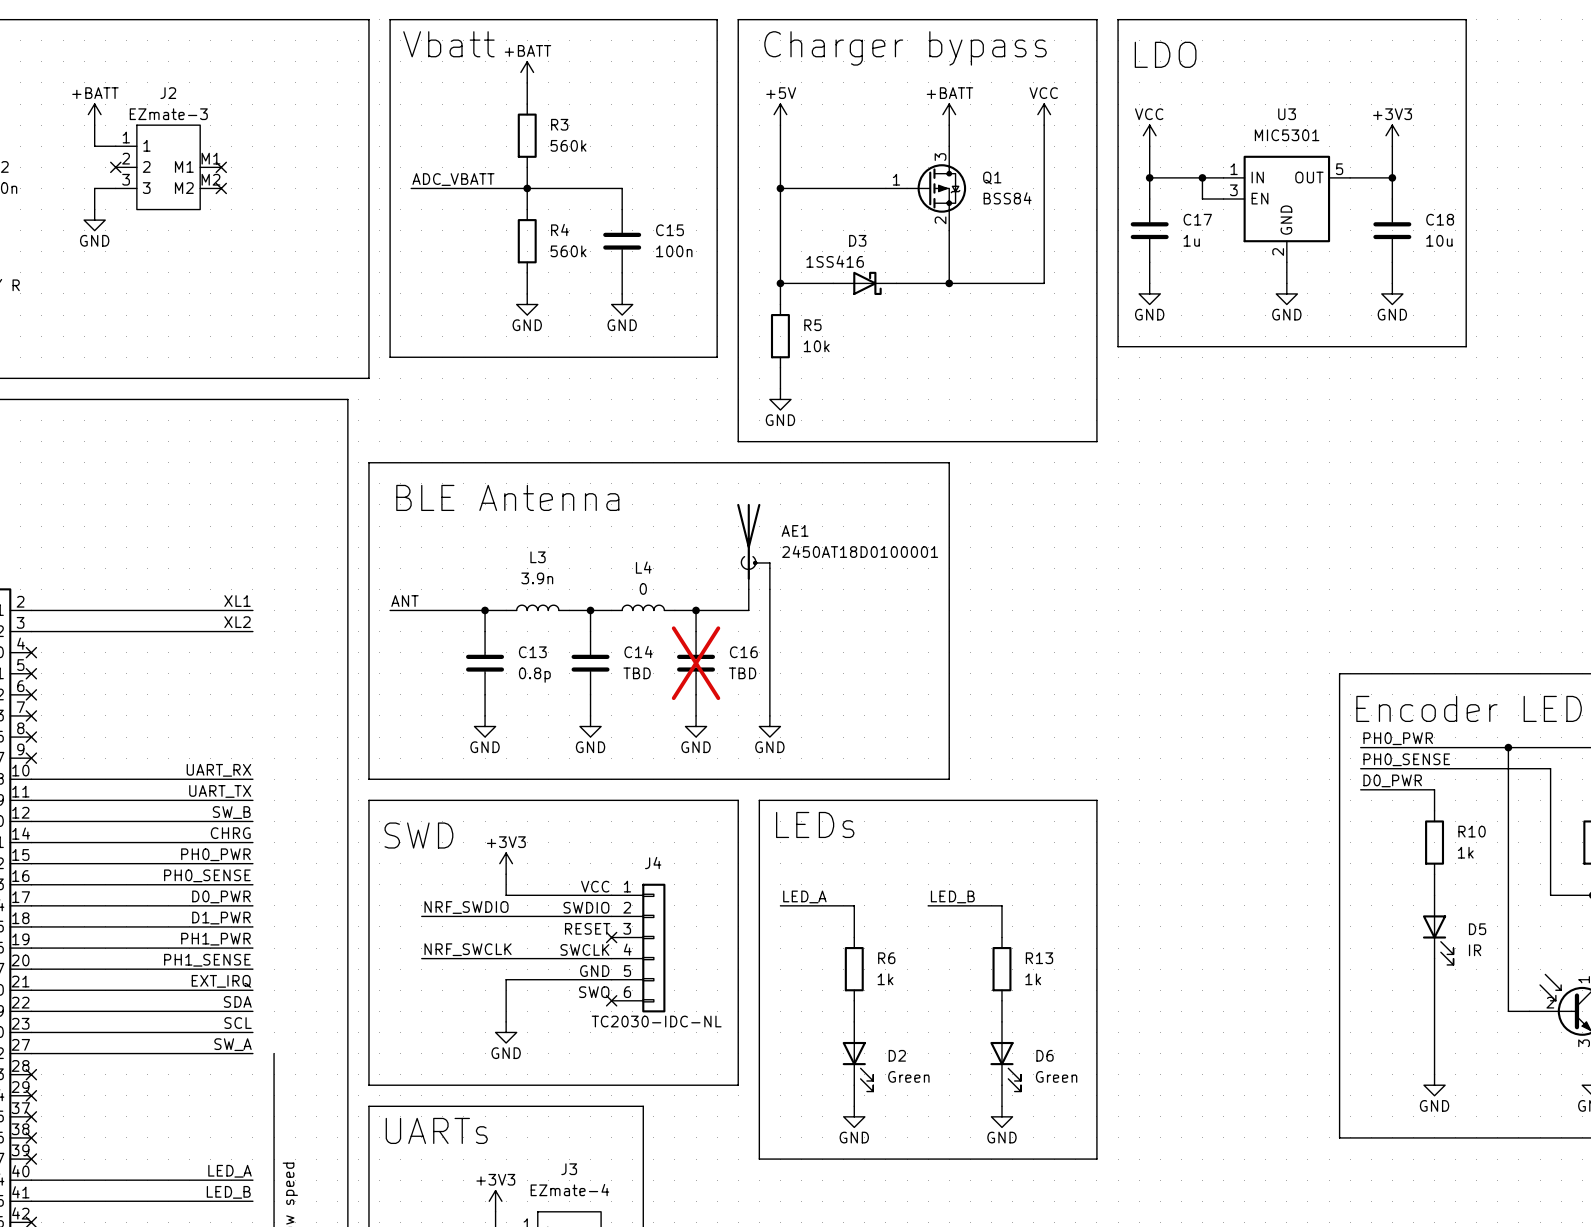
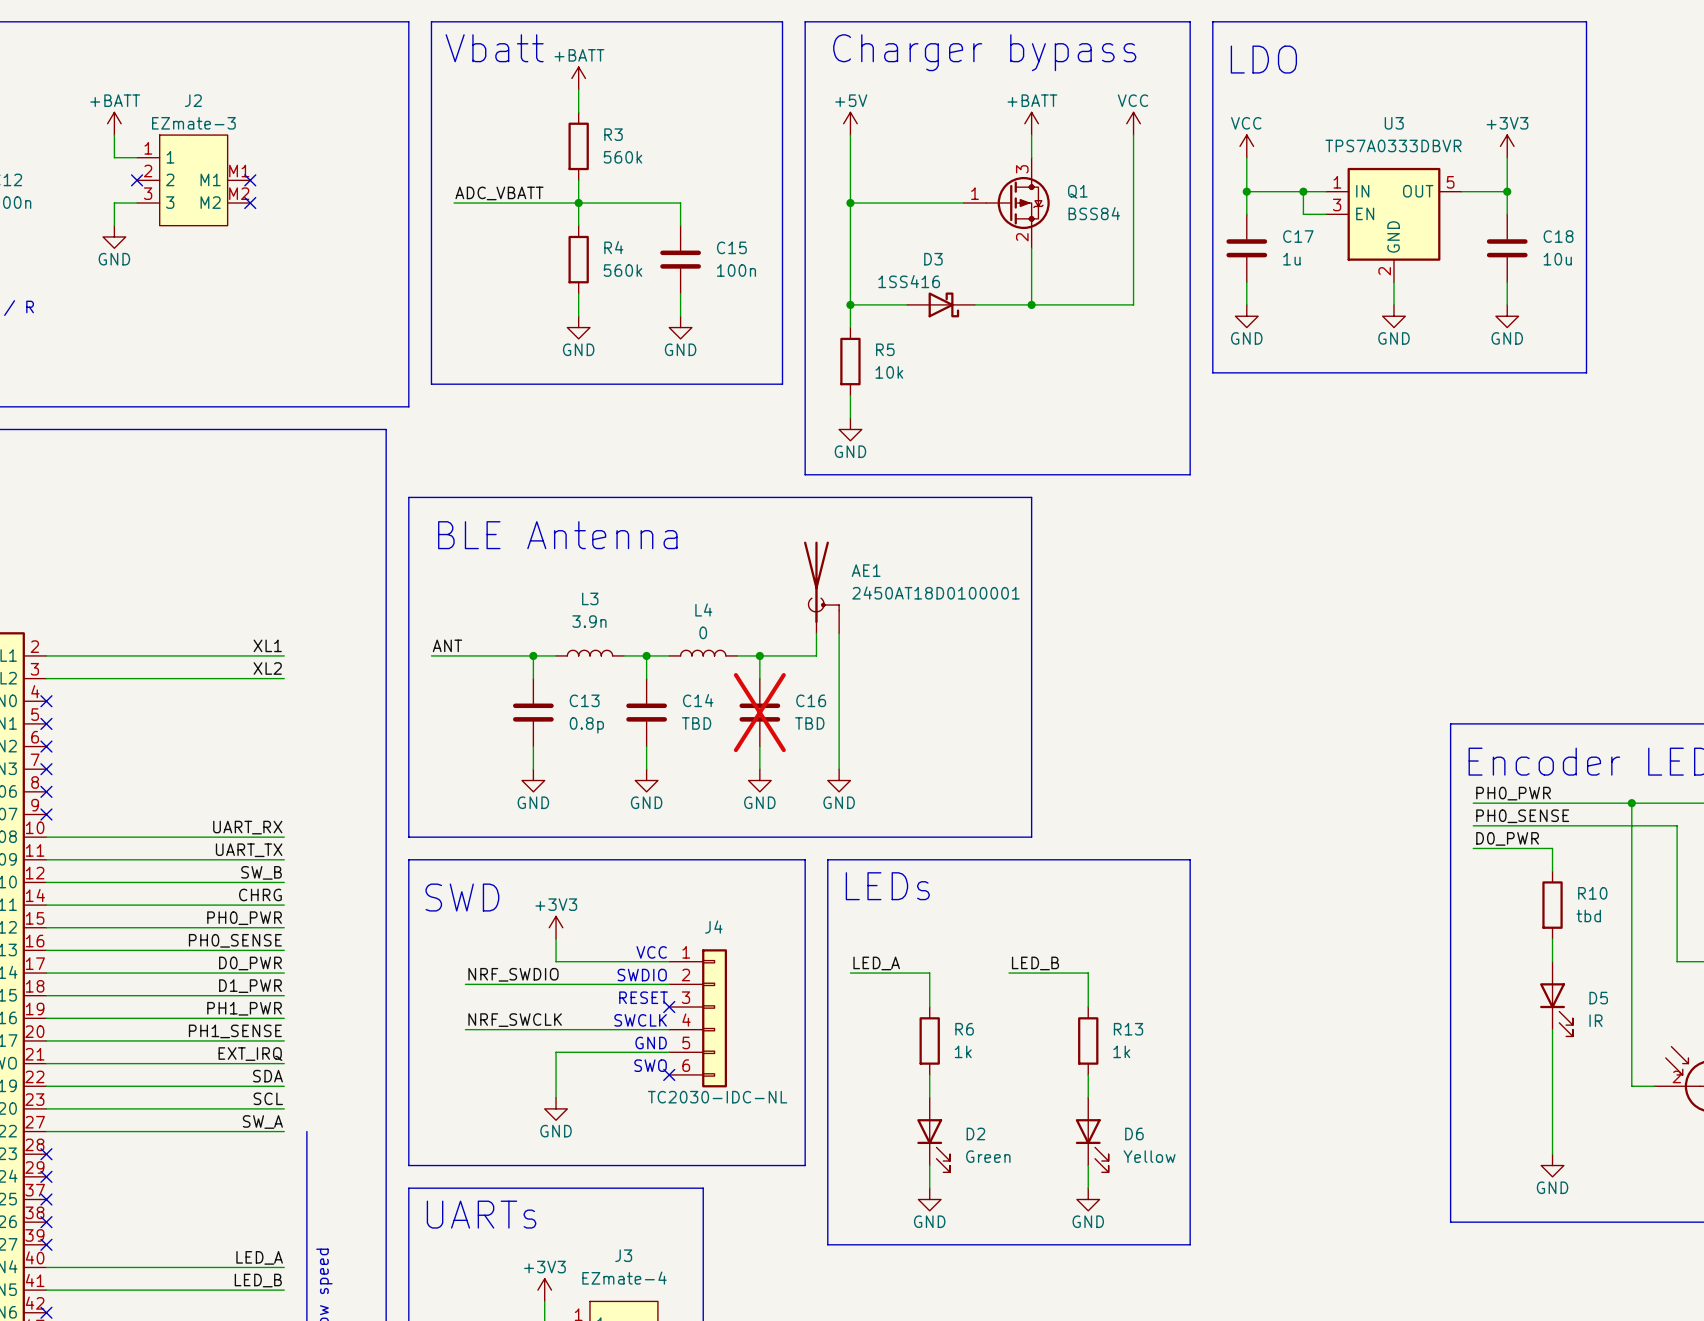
U3 value: MIC5301 (1287, 135) -> TPS7A0333DBVR (1393, 145)
R10 value: 1k (1465, 852) -> tbd (1588, 915)
D6 value: Green (1056, 1076) -> Yellow (1149, 1156)

